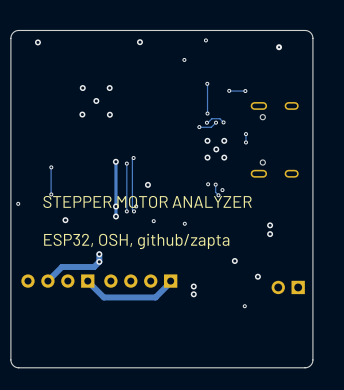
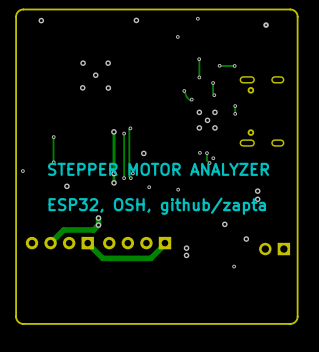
track: (207, 103) (207, 113) -> none
via: none -> (199, 77)
track: none -> (213, 83) (213, 93)
via: none -> (213, 83)
via: (207, 113) -> none
track: none -> (184, 91) (190, 100)
via: none -> (184, 91)
via: (206, 122) -> none
track: (215, 122) (211, 127) (199, 127) -> none
via: (216, 122) -> none
track: (223, 122) (219, 118) (211, 118) (206, 122) -> none

